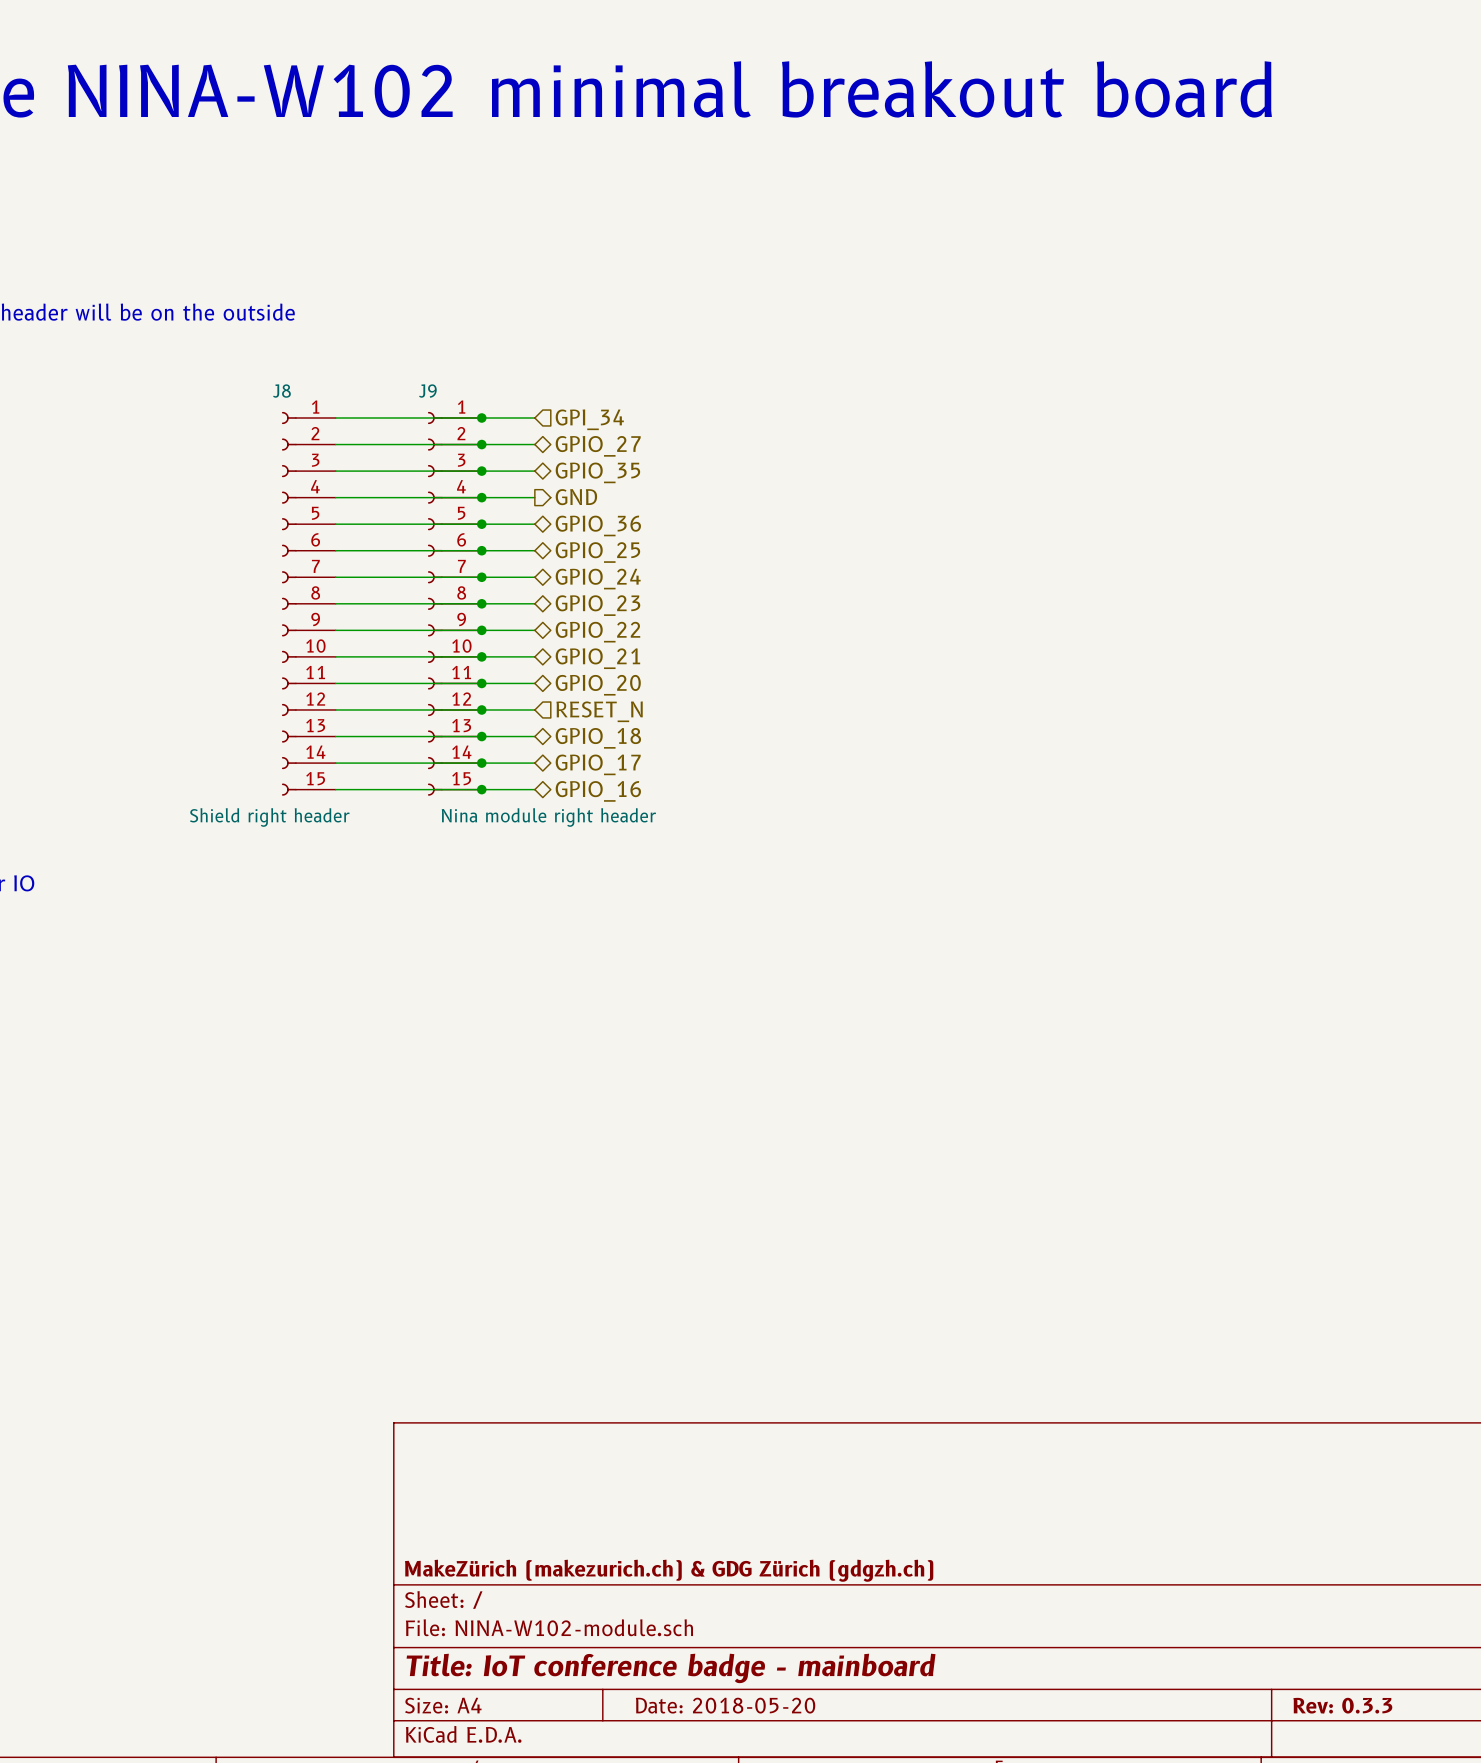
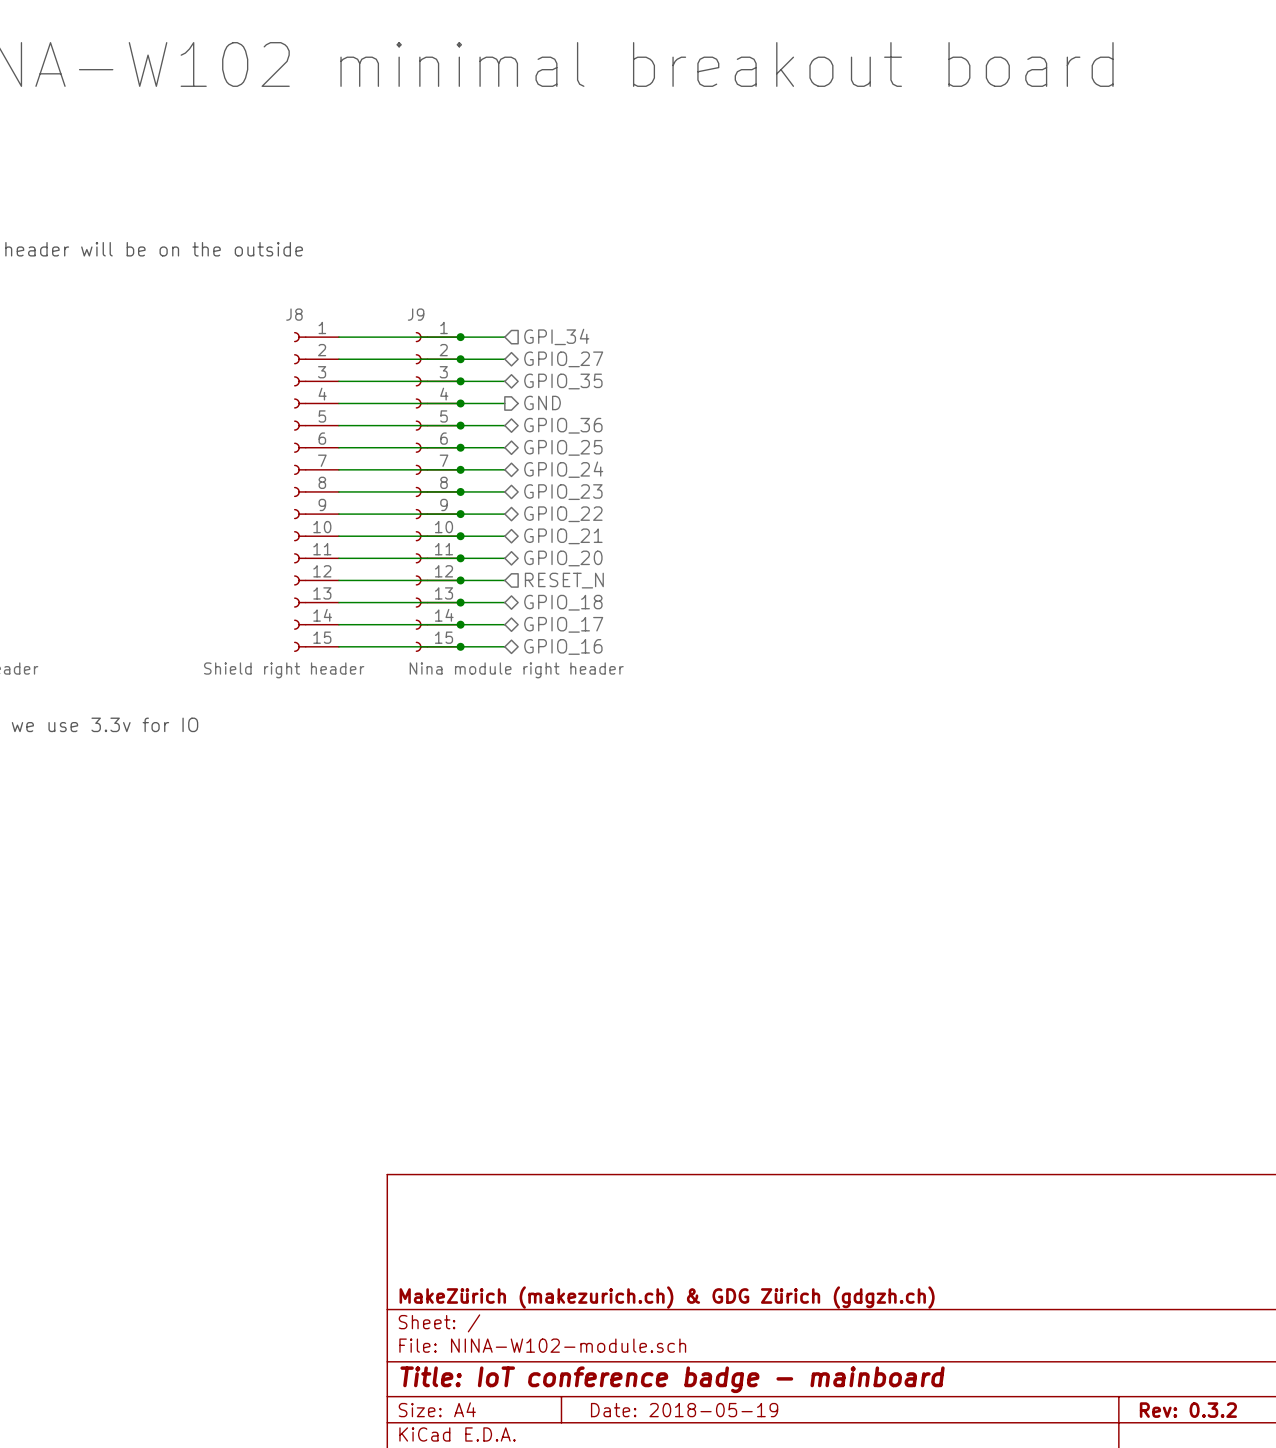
title block: Date: 2018-05-20 (725, 1705) -> Date: 2018-05-19 (684, 1410)
title block: Rev: 0.3.3 (1342, 1705) -> Rev: 0.3.2 (1188, 1410)

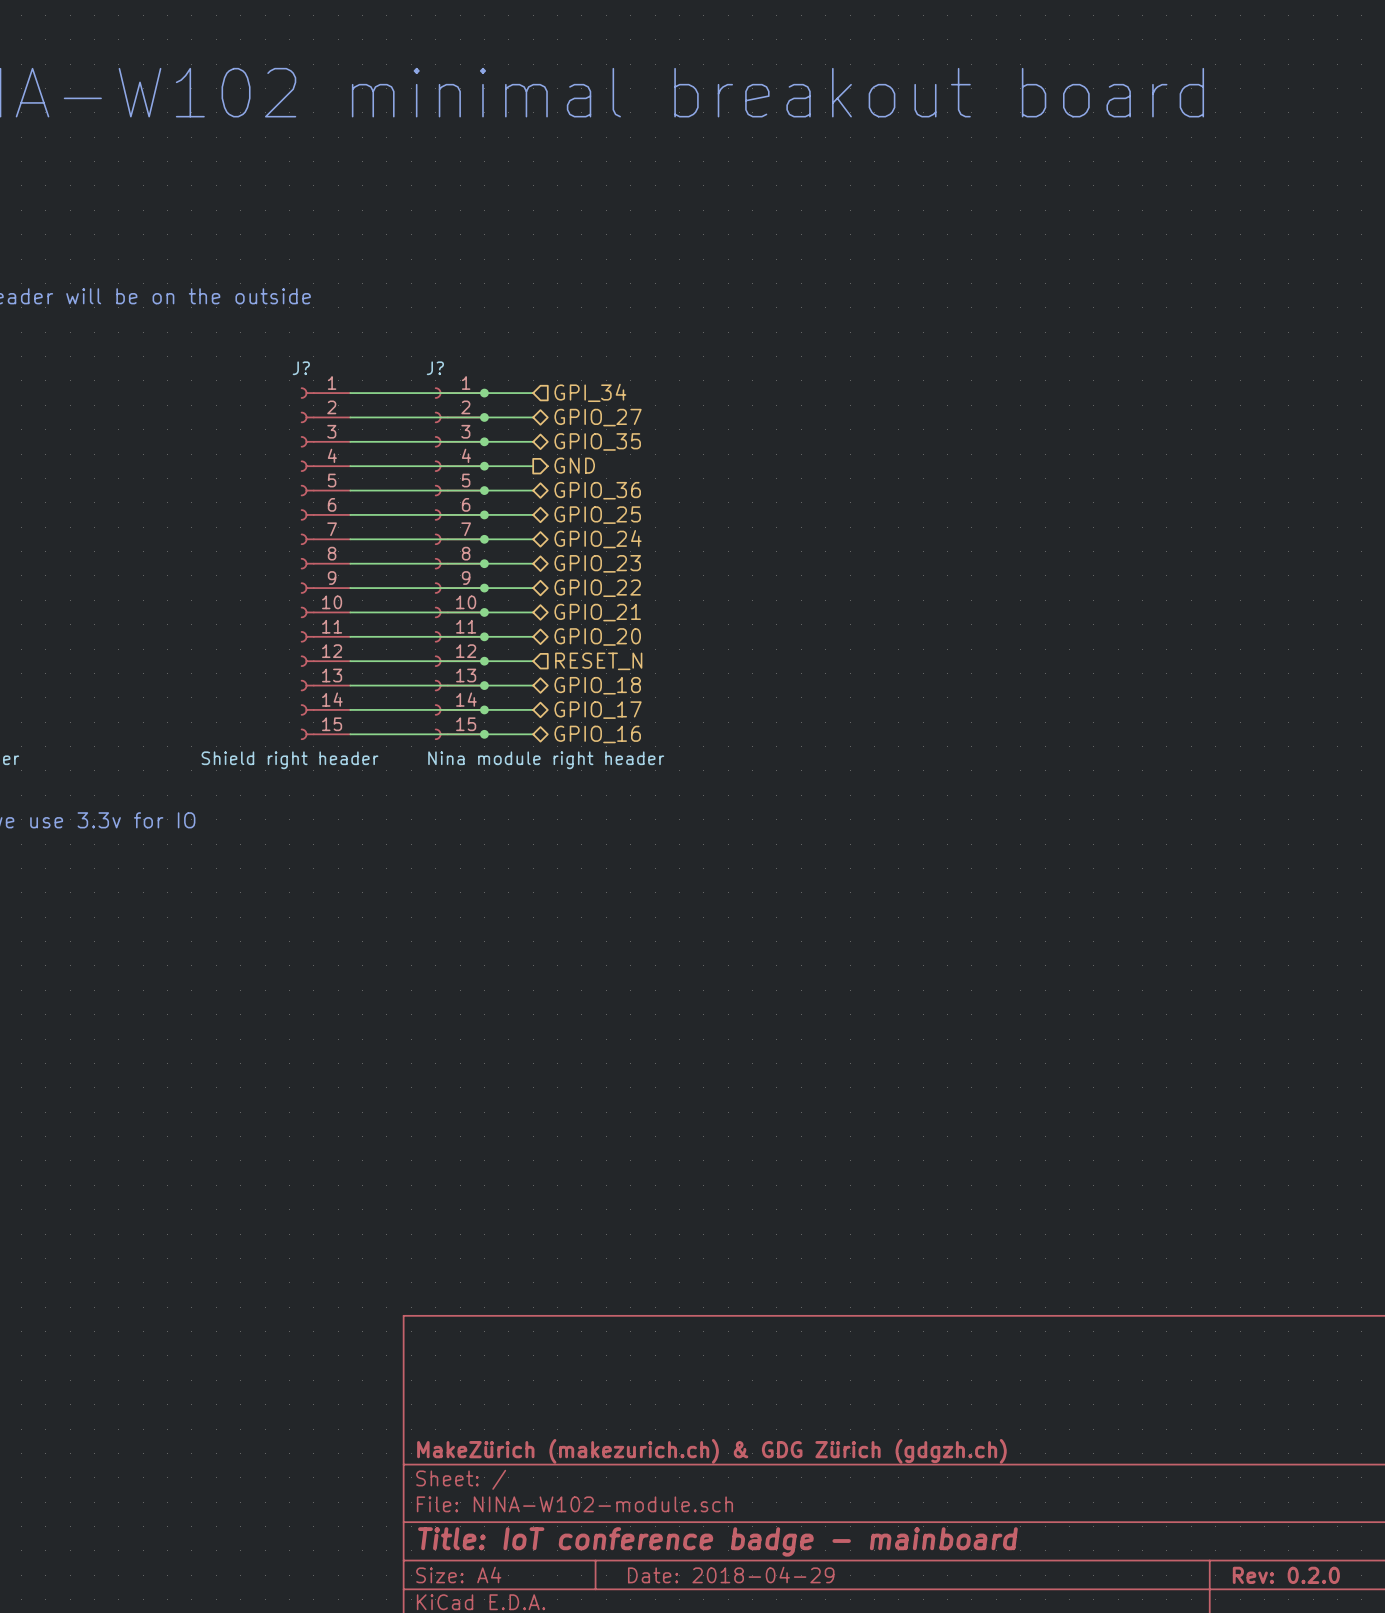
J8 name: J8 (294, 314) -> J? (301, 368)
J9 name: J9 (416, 314) -> J? (435, 368)
title block: Date: 2018-05-19 (684, 1410) -> Date: 2018-04-29 (731, 1575)
title block: Rev: 0.3.2 (1188, 1410) -> Rev: 0.2.0 (1286, 1575)

